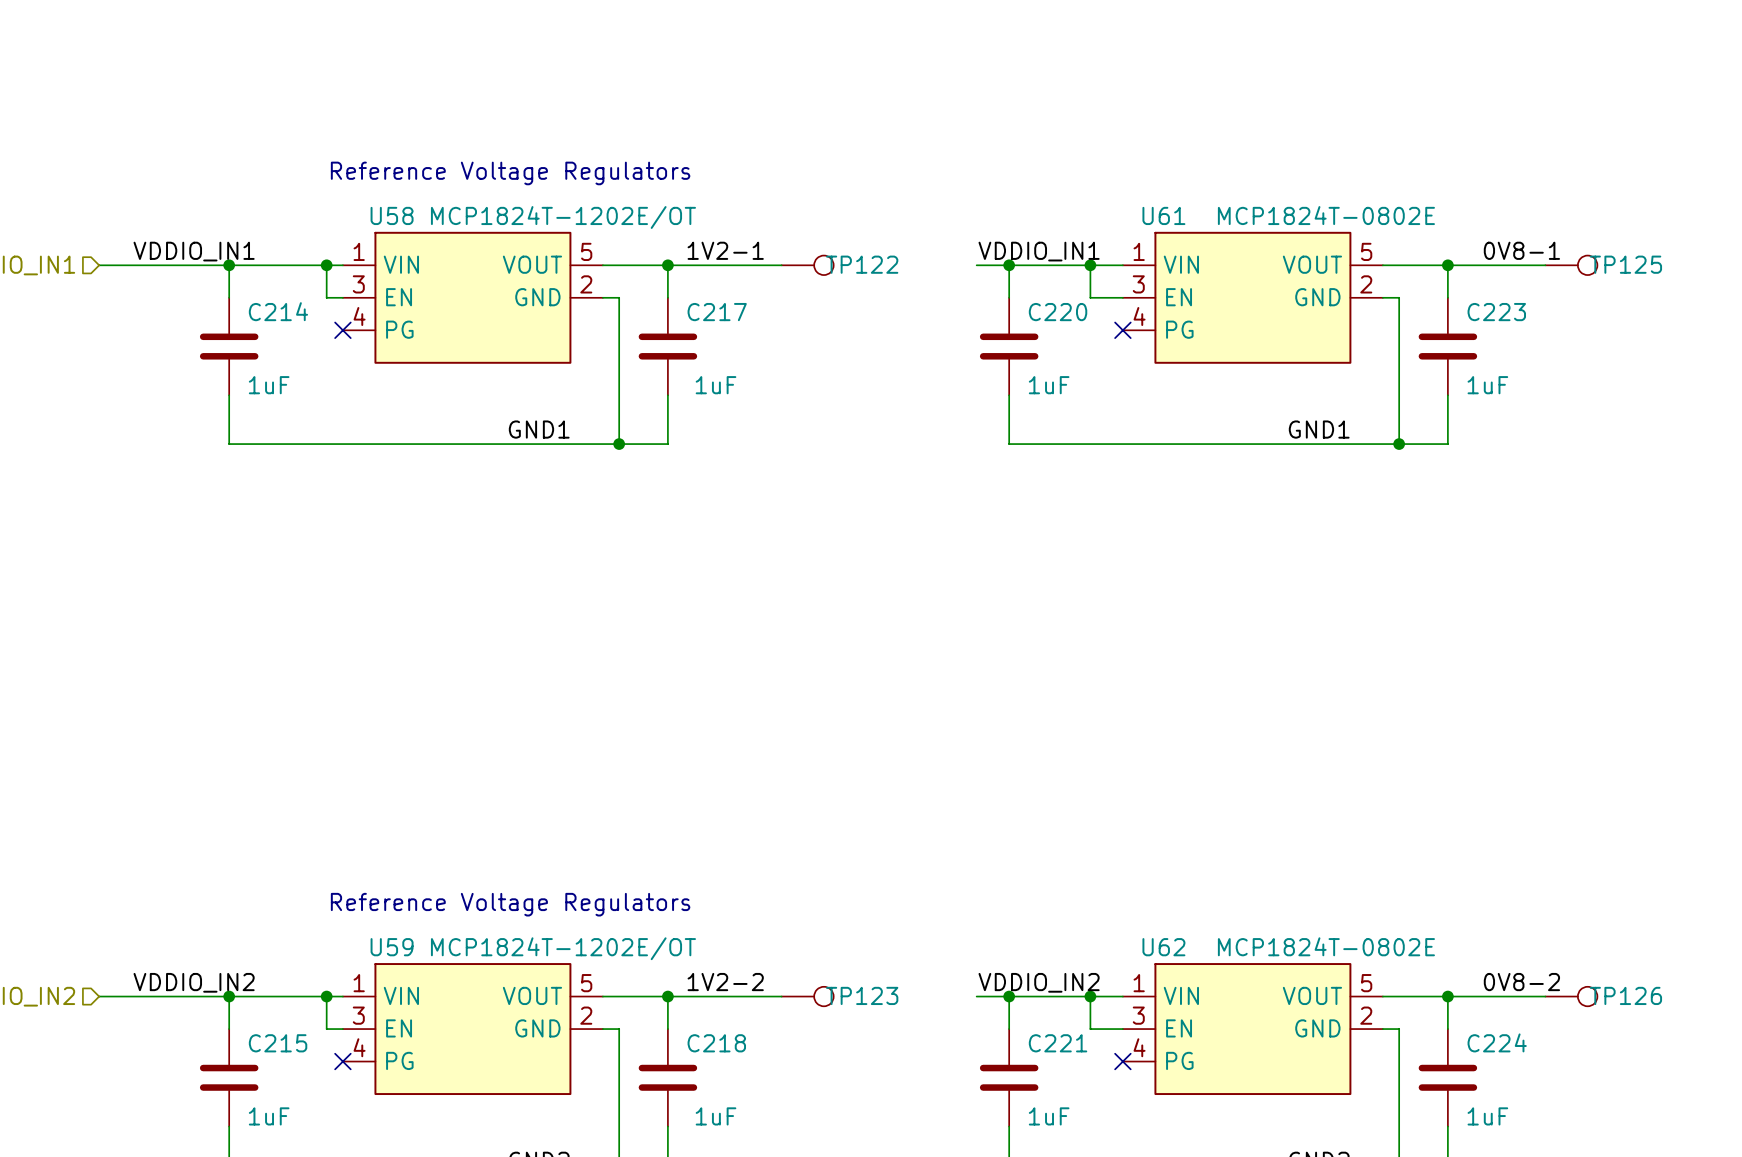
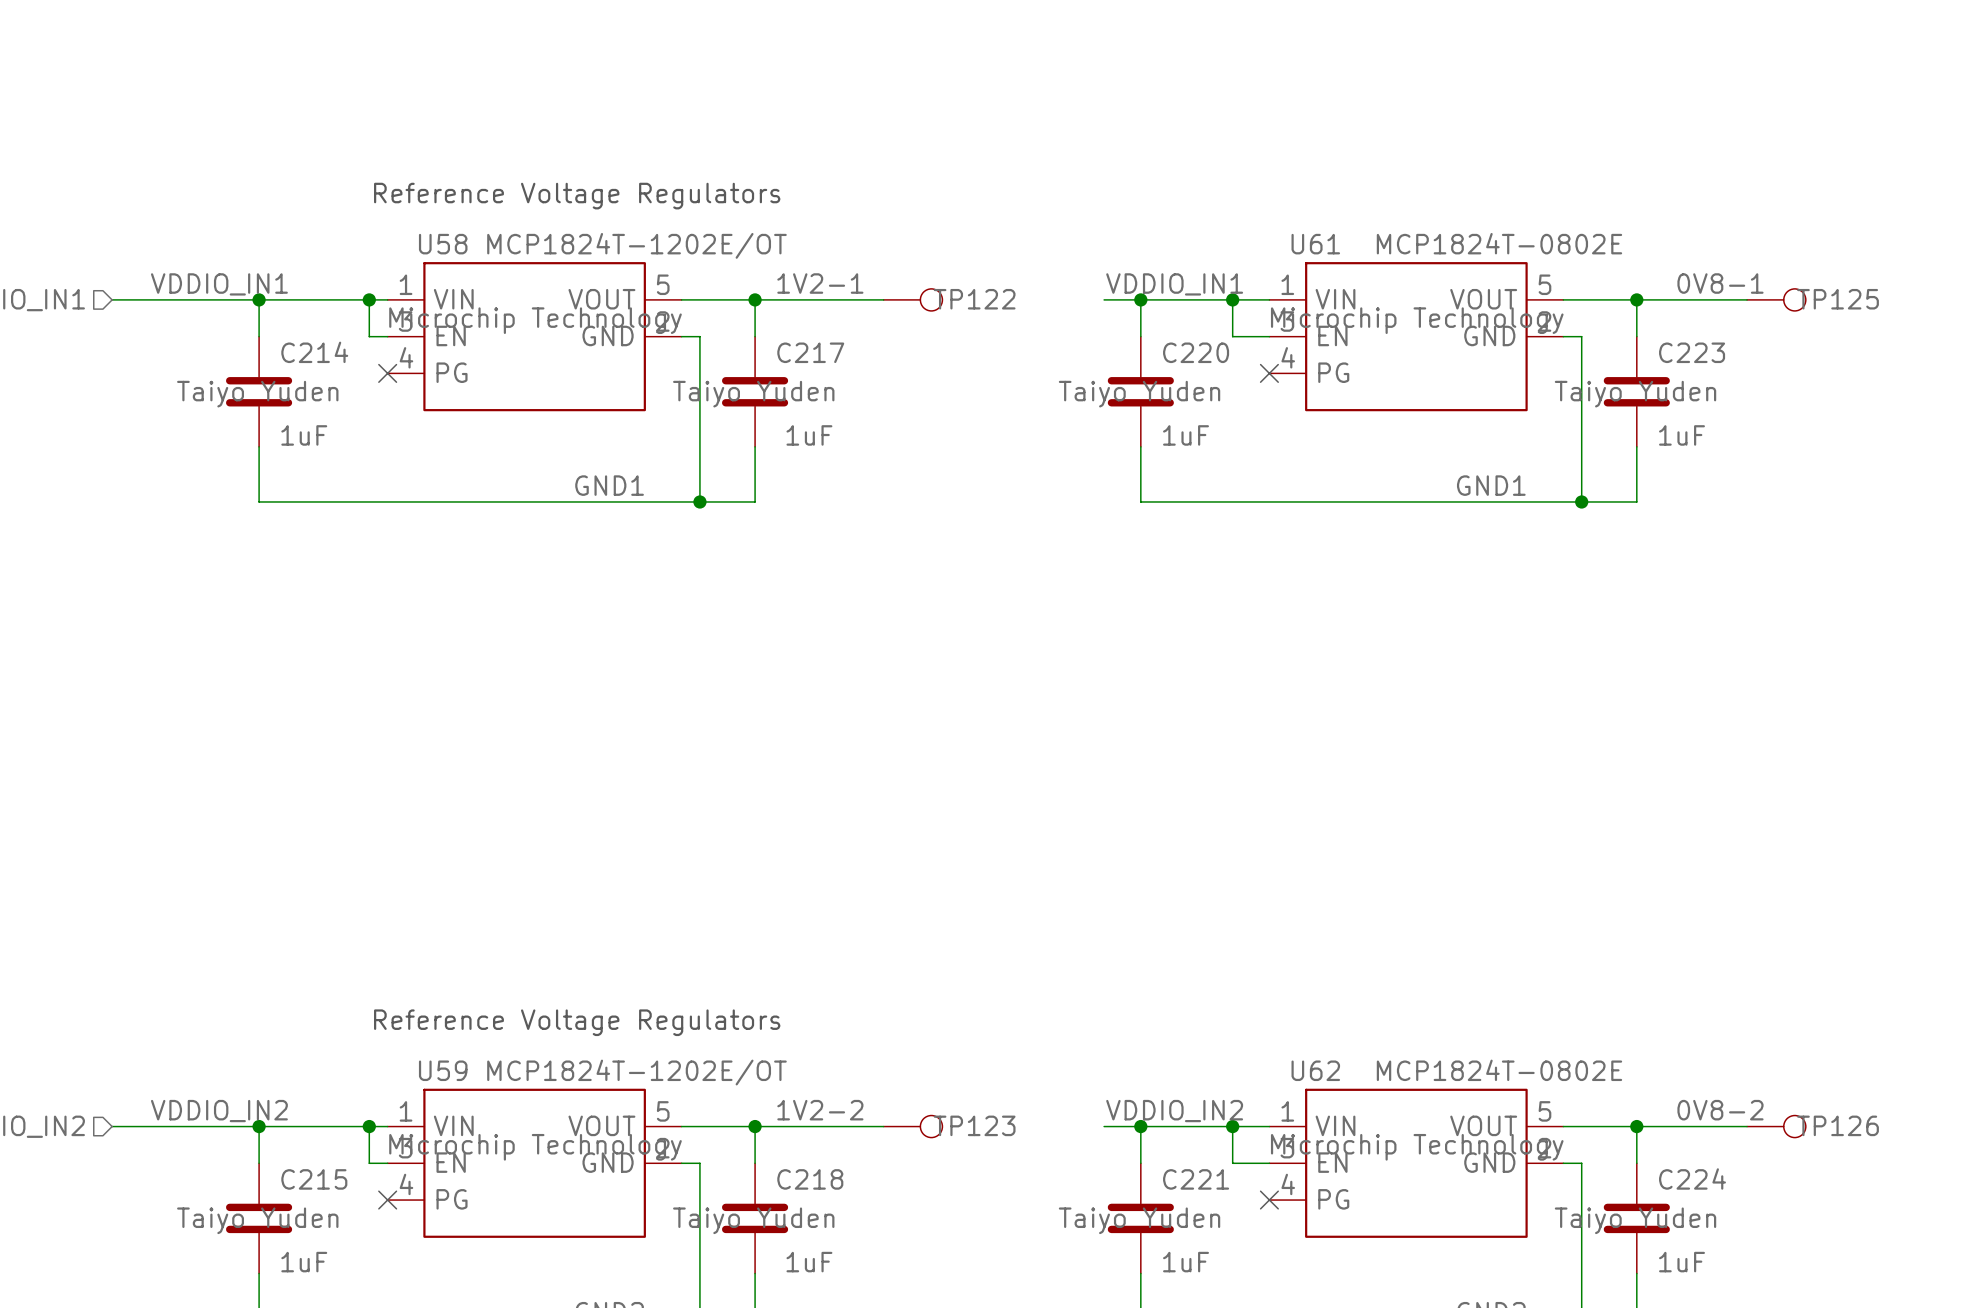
U58 text: none -> Microchip Technology (535, 320)
U61 text: none -> Microchip Technology (1417, 320)
C214 text: none -> Taiyo Yuden (257, 394)
C217 text: none -> Taiyo Yuden (753, 394)
C220 text: none -> Taiyo Yuden (1139, 394)
C223 text: none -> Taiyo Yuden (1635, 394)
U59 text: none -> Microchip Technology (535, 1147)
U62 text: none -> Microchip Technology (1417, 1147)
C215 text: none -> Taiyo Yuden (257, 1220)
C218 text: none -> Taiyo Yuden (753, 1220)
C221 text: none -> Taiyo Yuden (1139, 1220)
C224 text: none -> Taiyo Yuden (1635, 1220)

